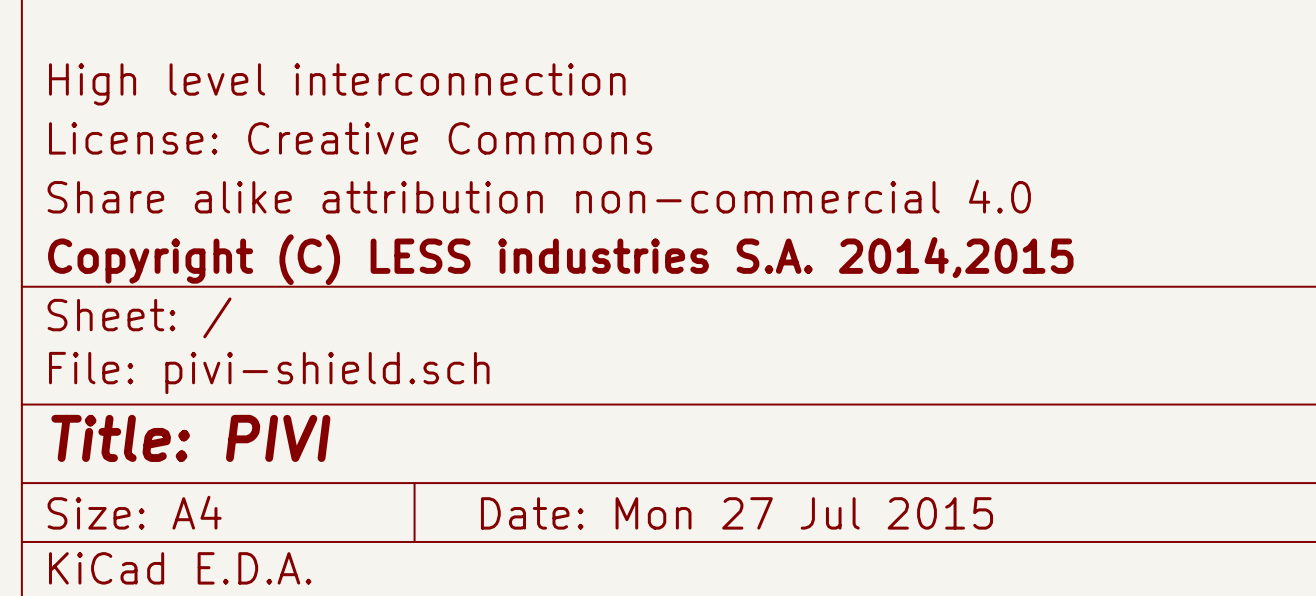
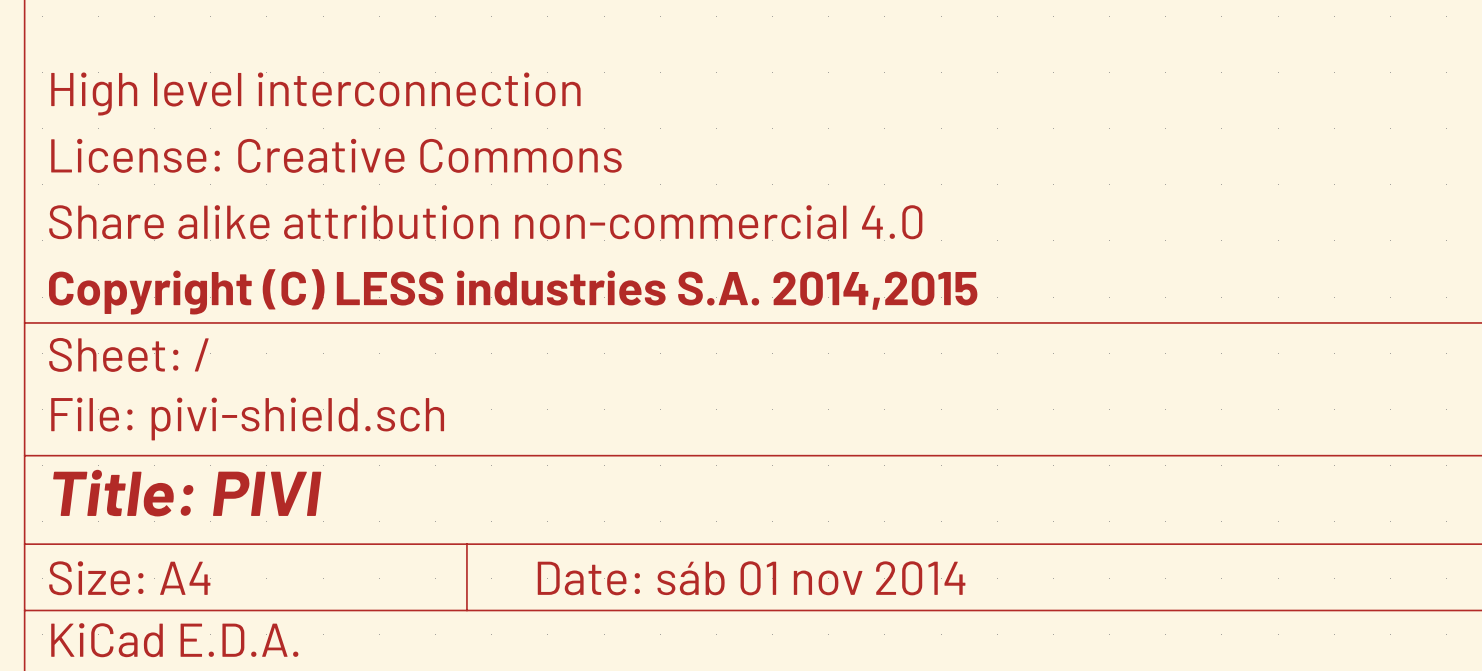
title block: Date: Mon 27 Jul 2015 (736, 513) -> Date: sáb 01 nov 2014 (751, 578)

